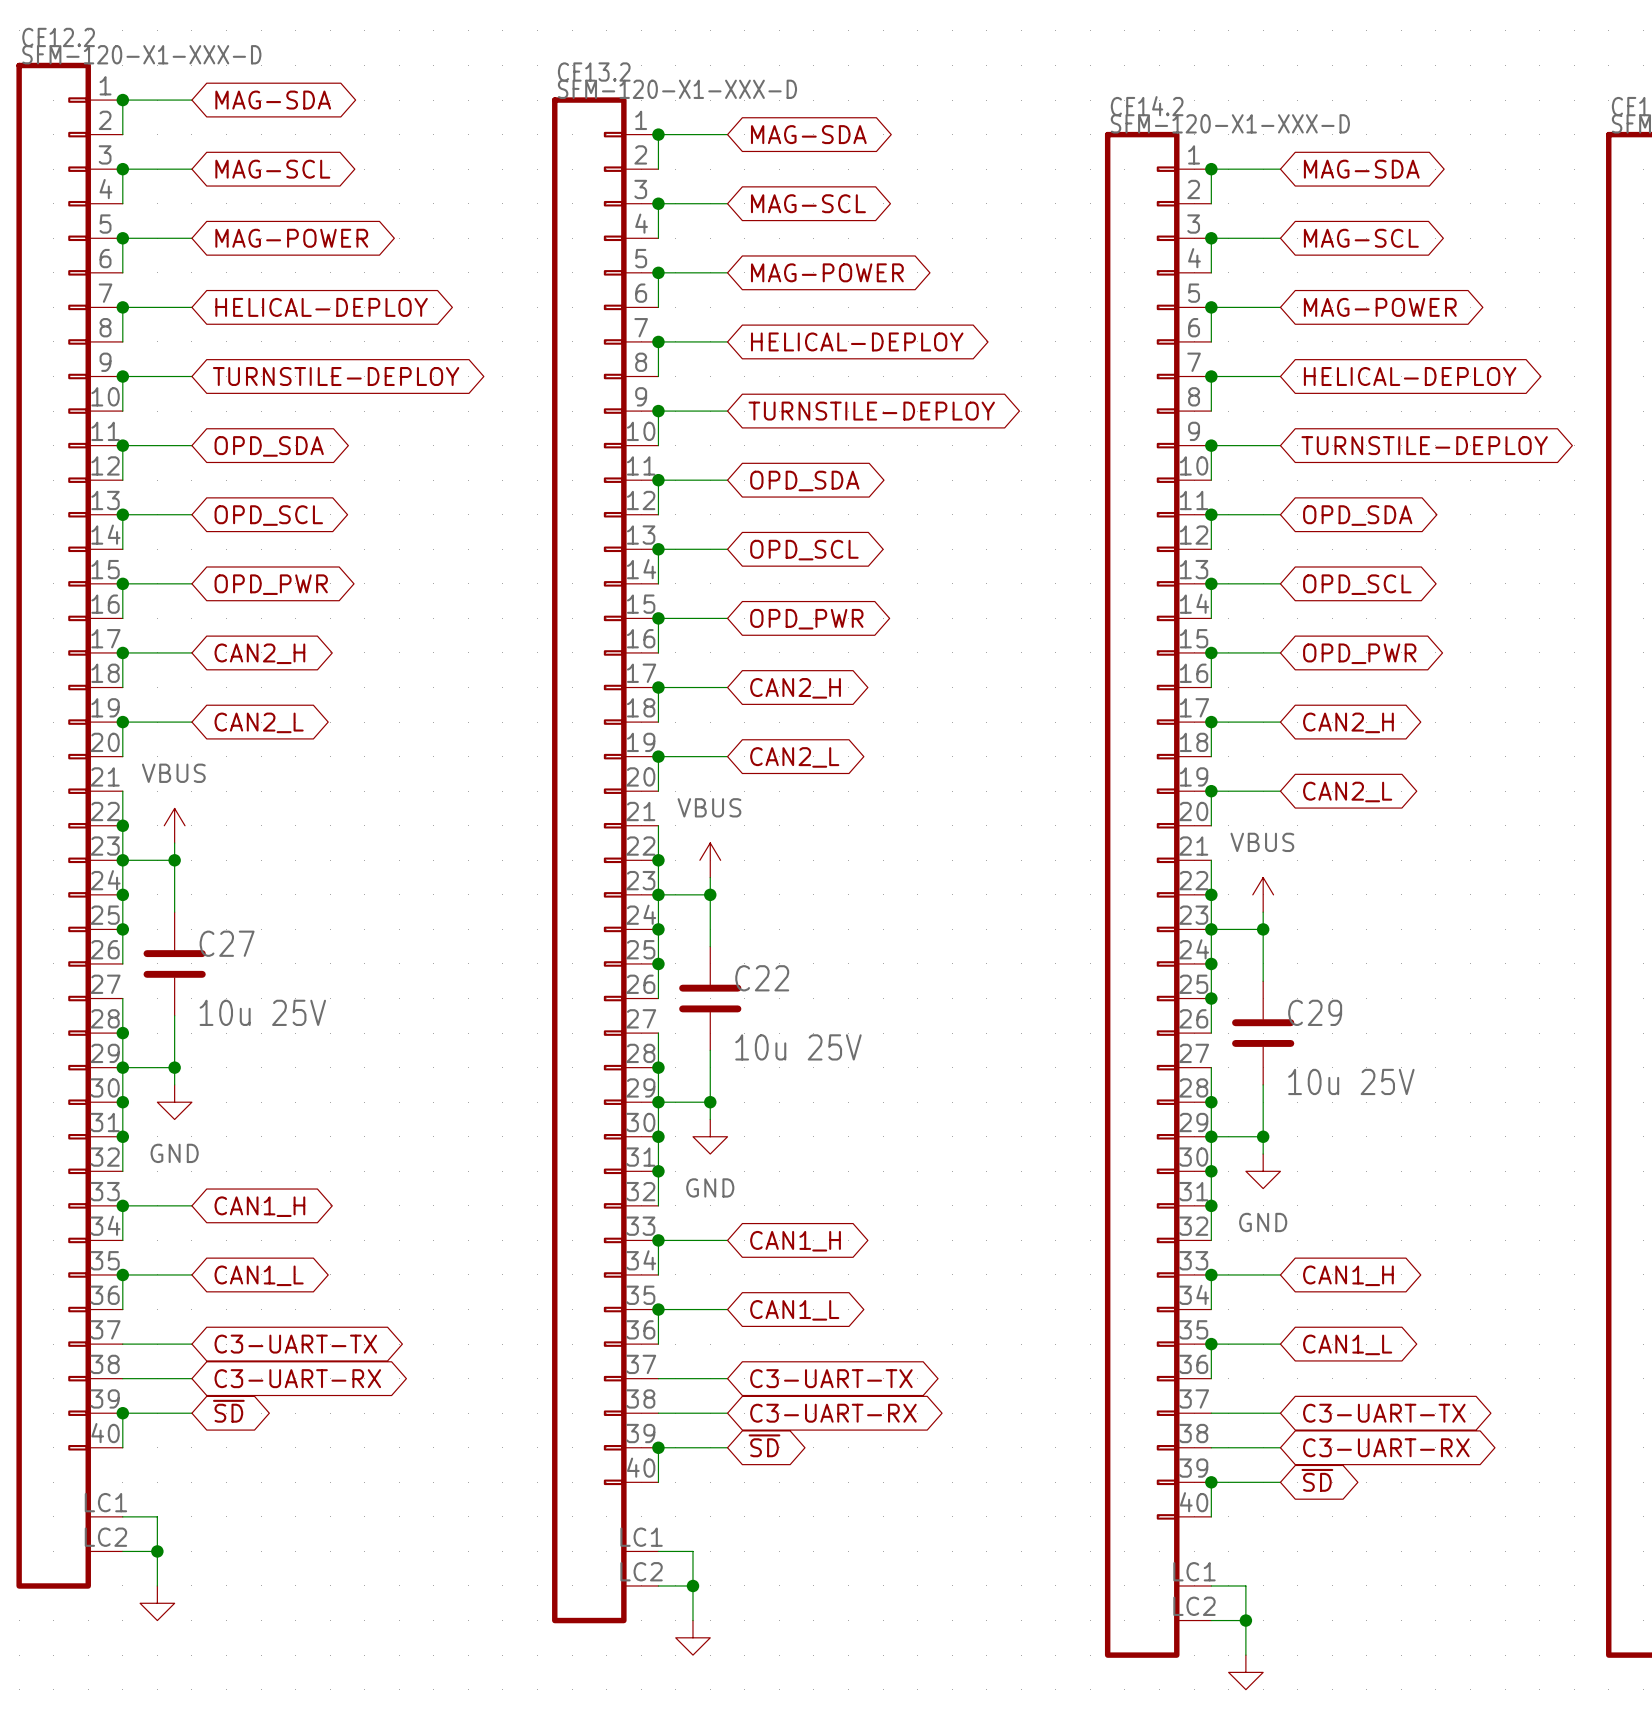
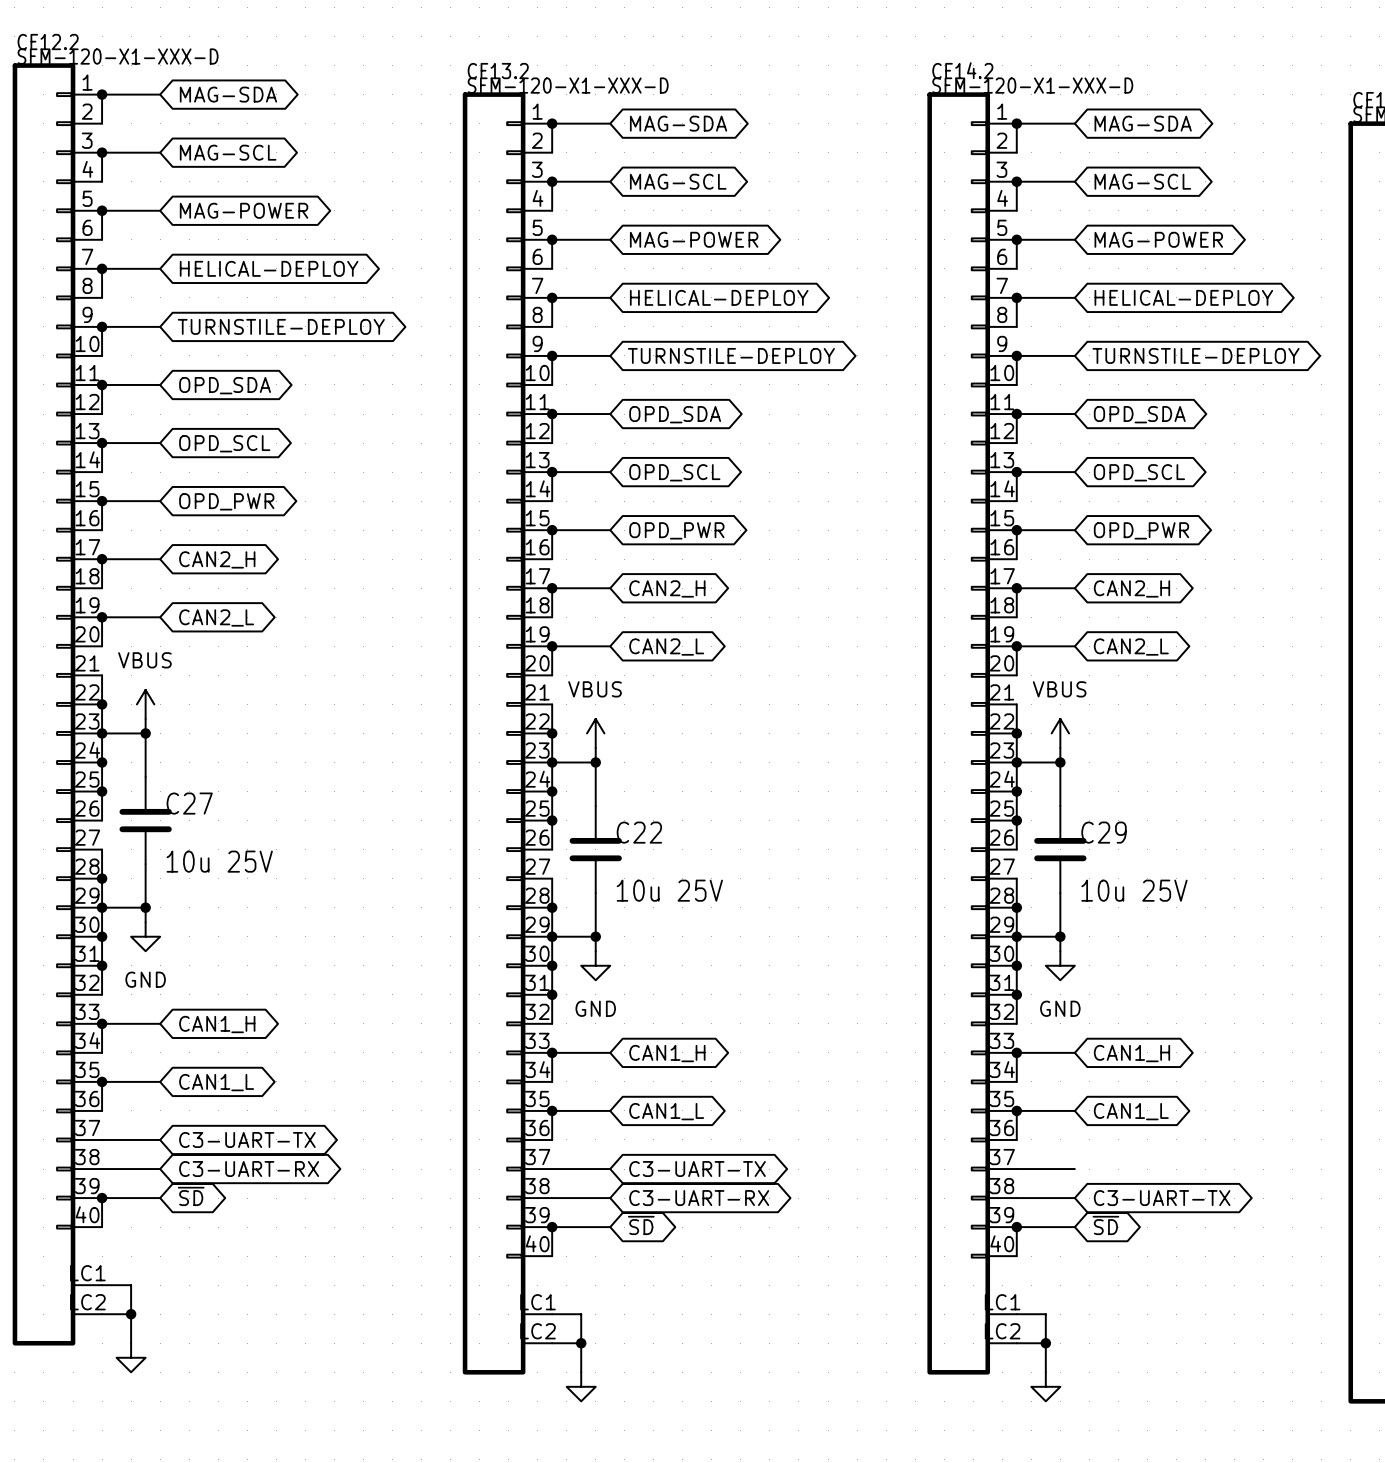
junction: none -> (1016, 123)
junction: (1211, 169) -> none
wire: (1280, 169) (1211, 169) (1211, 203) -> (1074, 123) (1016, 123) (1016, 152)
global label position: MAG-SDA (1361, 169) -> MAG-SDA (1143, 123)
junction: none -> (1016, 181)
junction: (1211, 238) -> none
wire: (1280, 238) (1211, 238) (1211, 272) -> (1074, 181) (1016, 181) (1016, 210)
global label position: MAG-SCL (1361, 238) -> MAG-SCL (1142, 181)
junction: none -> (1016, 239)
junction: (1211, 307) -> none
wire: (1280, 307) (1211, 307) (1211, 341) -> (1074, 239) (1016, 239) (1016, 268)
global label position: MAG-POWER (1380, 307) -> MAG-POWER (1158, 239)
junction: none -> (1016, 297)
junction: (1211, 376) -> none
wire: (1280, 376) (1211, 376) (1211, 411) -> (1074, 297) (1016, 297) (1016, 326)
global label position: HELICAL-DEPLOY (1410, 376) -> HELICAL-DEPLOY (1183, 297)
junction: none -> (1016, 355)
junction: (1211, 445) -> none
wire: (1280, 445) (1211, 445) (1211, 480) -> (1074, 355) (1016, 355) (1016, 384)
global label position: TURNSTILE-DEPLOY (1424, 445) -> TURNSTILE-DEPLOY (1196, 355)
junction: none -> (1016, 414)
junction: (1211, 514) -> none
wire: (1280, 514) (1211, 514) (1211, 549) -> (1074, 414) (1016, 414) (1016, 443)
global label position: OPD_SDA (1357, 515) -> OPD_SDA (1139, 414)
junction: none -> (1016, 472)
junction: (1211, 583) -> none
wire: (1280, 583) (1211, 583) (1211, 618) -> (1074, 472) (1016, 472) (1016, 501)
global label position: OPD_SCL (1357, 584) -> OPD_SCL (1139, 472)
junction: none -> (1016, 530)
junction: (1211, 652) -> none
wire: (1280, 652) (1211, 652) (1211, 687) -> (1074, 530) (1016, 530) (1016, 559)
global label position: OPD_PWR (1359, 653) -> OPD_PWR (1141, 530)
junction: none -> (1016, 588)
junction: (1211, 722) -> none
wire: (1280, 722) (1211, 722) (1211, 756) -> (1074, 588) (1016, 588) (1016, 617)
global label position: CAN2_H (1348, 722) -> CAN2_H (1131, 588)
junction: none -> (1016, 646)
wire: none -> (1074, 646) (1016, 646) (1016, 675)
junction: (1211, 791) -> none
wire: (1280, 791) (1211, 791) (1211, 825) -> (1016, 733) (1016, 704)
global label position: CAN2_L (1347, 791) -> CAN2_L (1131, 647)
junction: none -> (1016, 733)
CF14.2 position: (1158, 894) -> (972, 733)
power symbol position: VBUS (1263, 894) -> VBUS (1060, 733)
wire: (1211, 929) (1263, 929) -> (1016, 762) (1060, 762)
junction position: (1263, 929) -> (1060, 762)
wire: (1211, 998) (1211, 1033) -> (1016, 907) (1016, 878)
junction: (1211, 998) -> none
C29 position: (1263, 1033) -> (1060, 849)
junction: none -> (1016, 907)
wire: (1211, 1136) (1263, 1136) -> (1016, 936) (1060, 936)
junction position: (1263, 1136) -> (1060, 936)
power symbol position: GND (1263, 1171) -> GND (1060, 965)
wire: (1211, 1205) (1211, 1240) -> (1016, 1227) (1016, 1256)
junction: (1211, 1205) -> none
junction: none -> (1016, 1052)
junction: (1211, 1274) -> none
wire: (1280, 1274) (1211, 1274) (1211, 1309) -> (1074, 1052) (1016, 1052) (1016, 1081)
global label position: CAN1_H (1348, 1275) -> CAN1_H (1131, 1053)
junction: none -> (1016, 1110)
junction: (1211, 1344) -> none
wire: (1280, 1344) (1211, 1344) (1211, 1378) -> (1074, 1169) (1016, 1169)
global label position: CAN1_L (1347, 1344) -> CAN1_L (1131, 1111)
global label: C3-UART-RX (1386, 1447) -> ~{SD} (1105, 1225)
global label: ~{SD} (1317, 1480) -> none
junction position: (1211, 1482) -> (1016, 1227)
wire: (1280, 1482) (1211, 1482) (1211, 1516) -> (1074, 1110) (1016, 1110) (1016, 1139)
wire: (1211, 1620) (1245, 1620) (1245, 1655) -> (1016, 1314) (1045, 1314) (1045, 1343)
junction position: (1245, 1620) -> (1045, 1343)
power symbol position: (1245, 1672) -> (1045, 1386)

